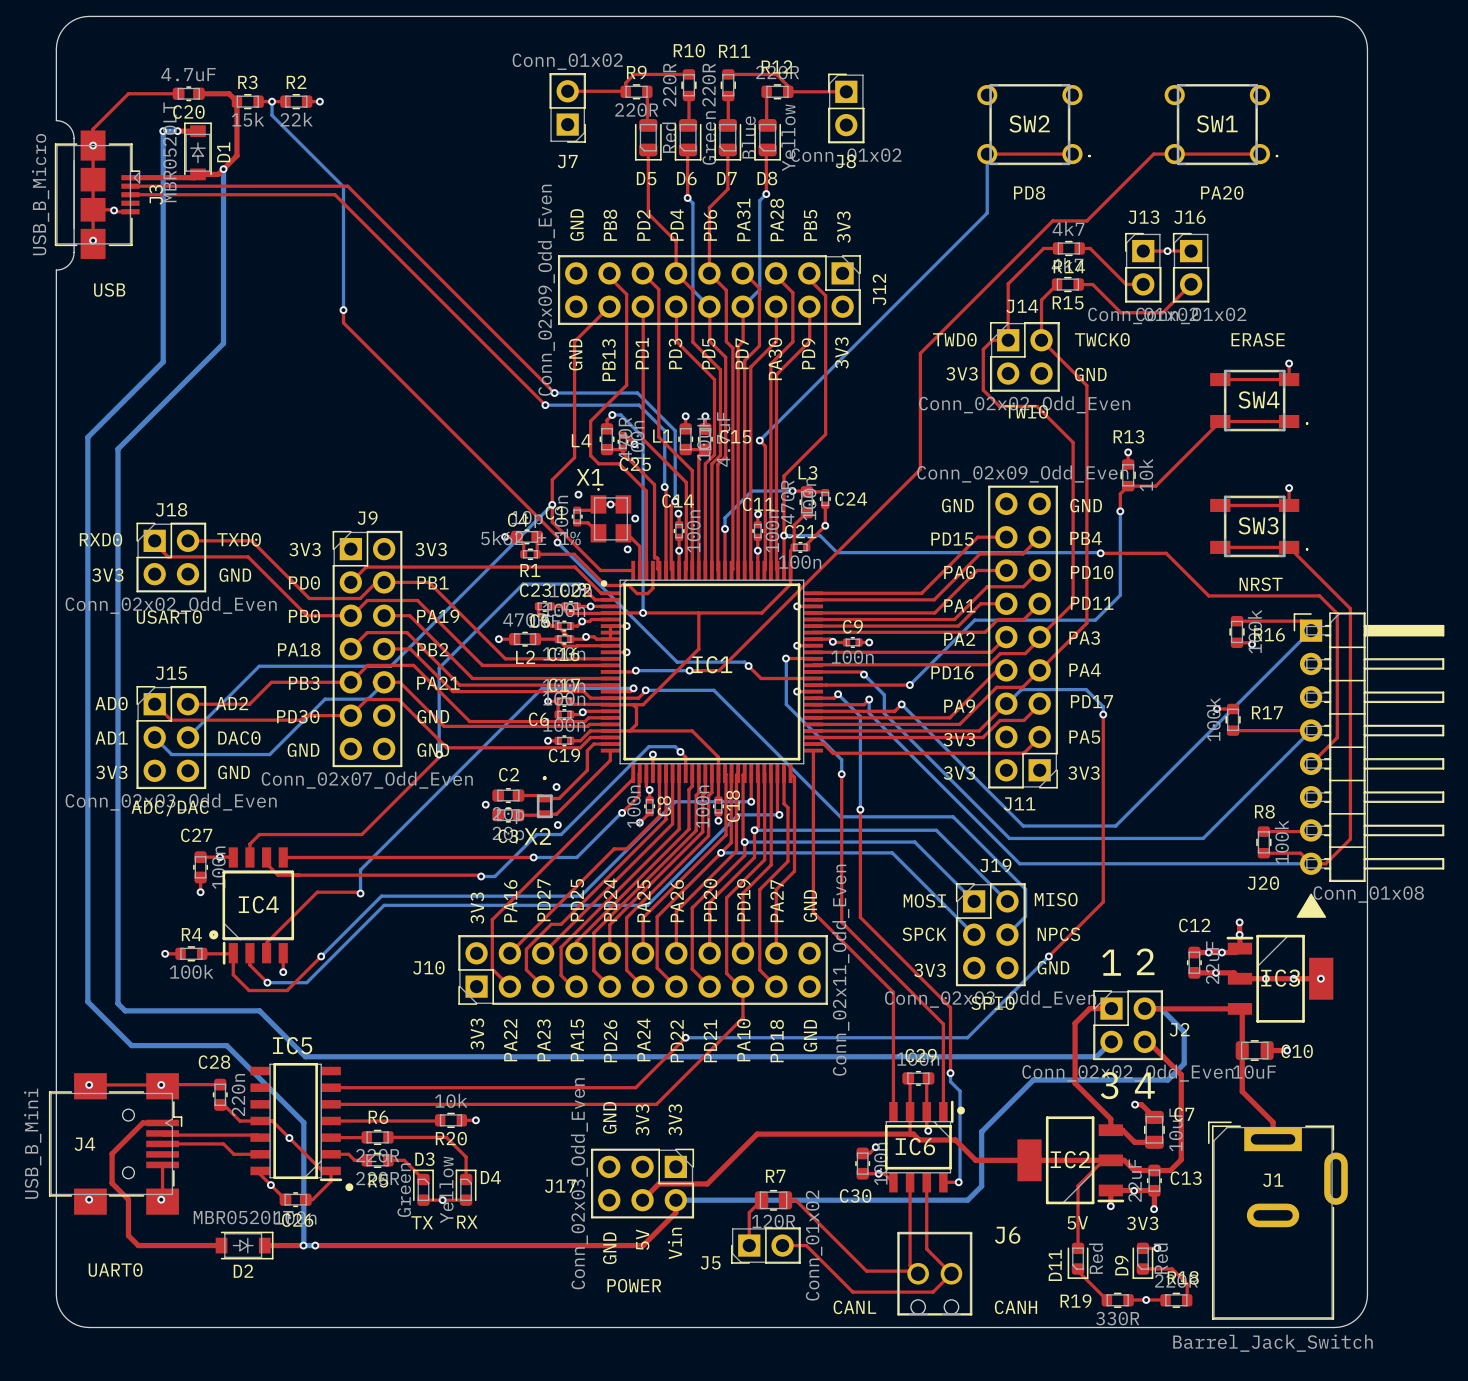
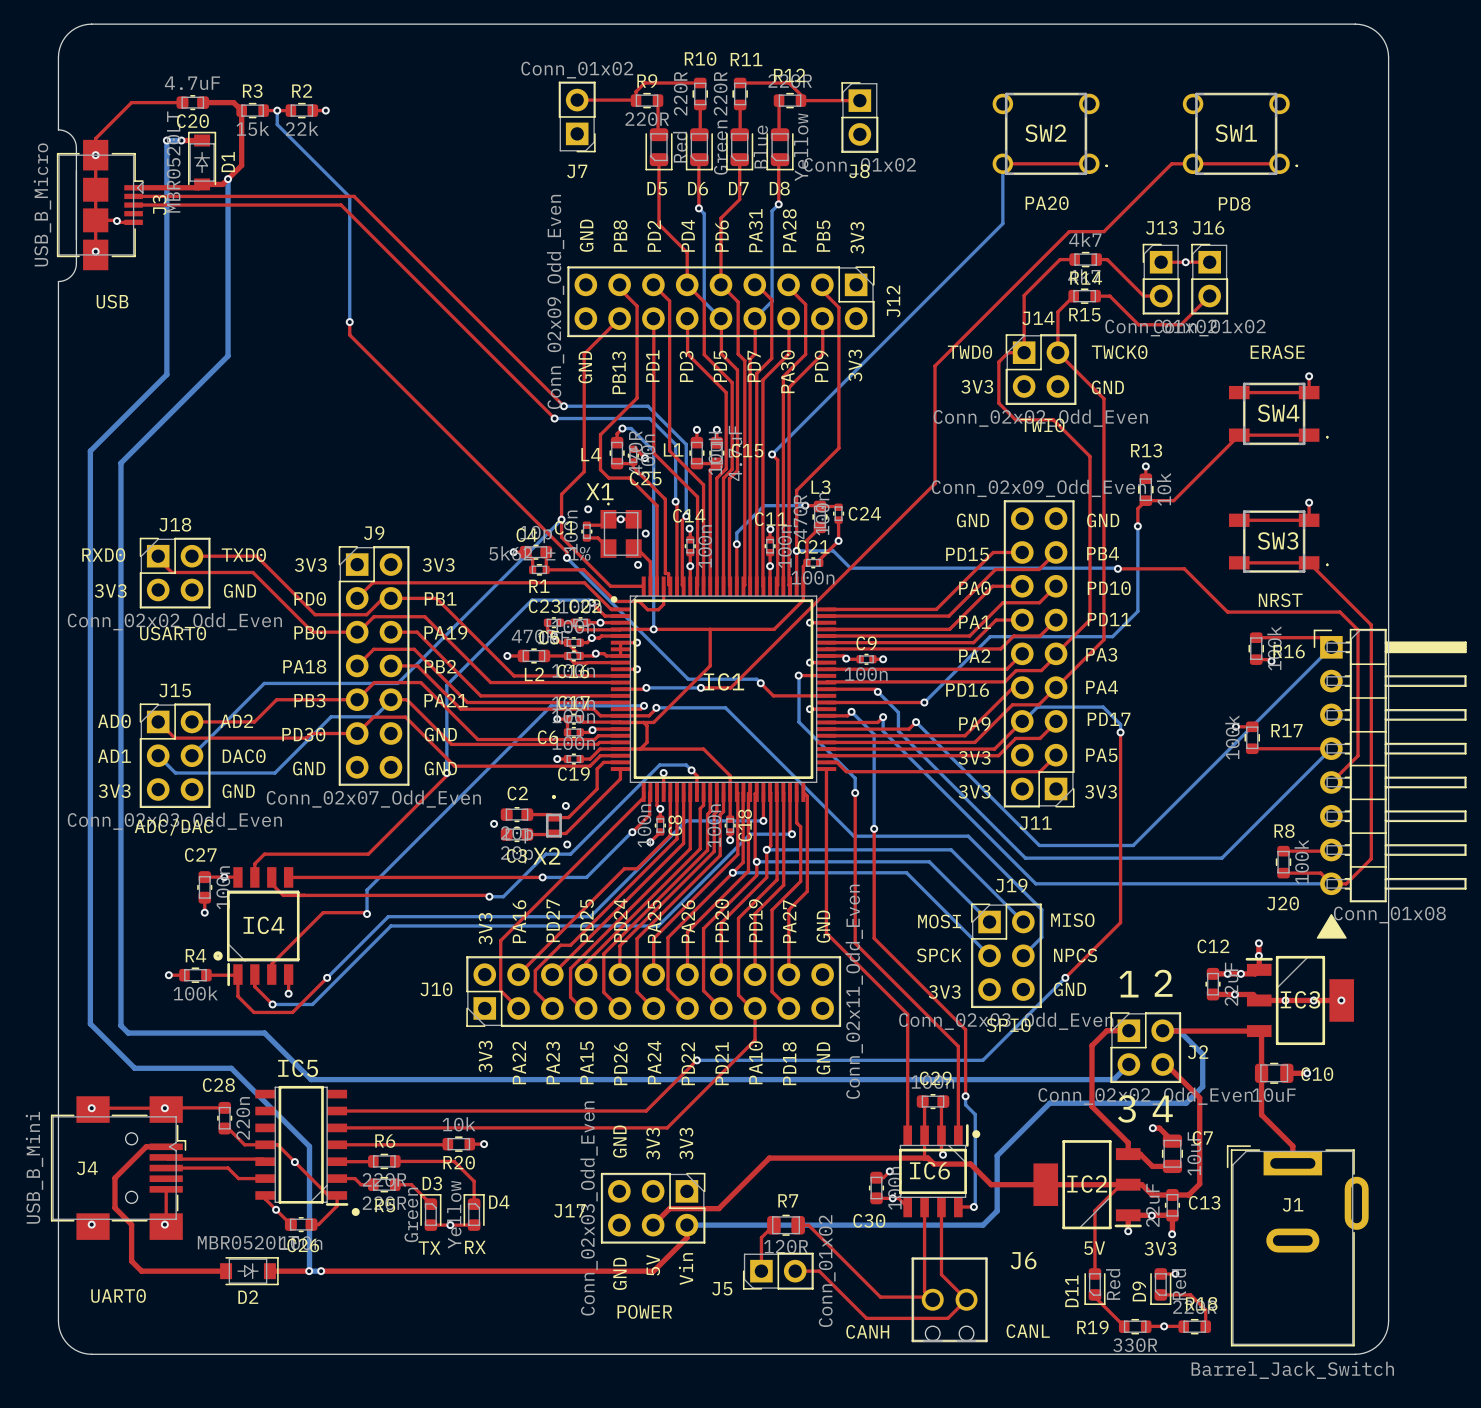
text: PD8 (1029, 192) -> PA20 (1047, 203)
text: PA20 (1222, 192) -> PD8 (1234, 203)
text position: CANL (854, 1307) -> CANL (1028, 1331)
text position: CANH (1015, 1307) -> CANH (867, 1331)

